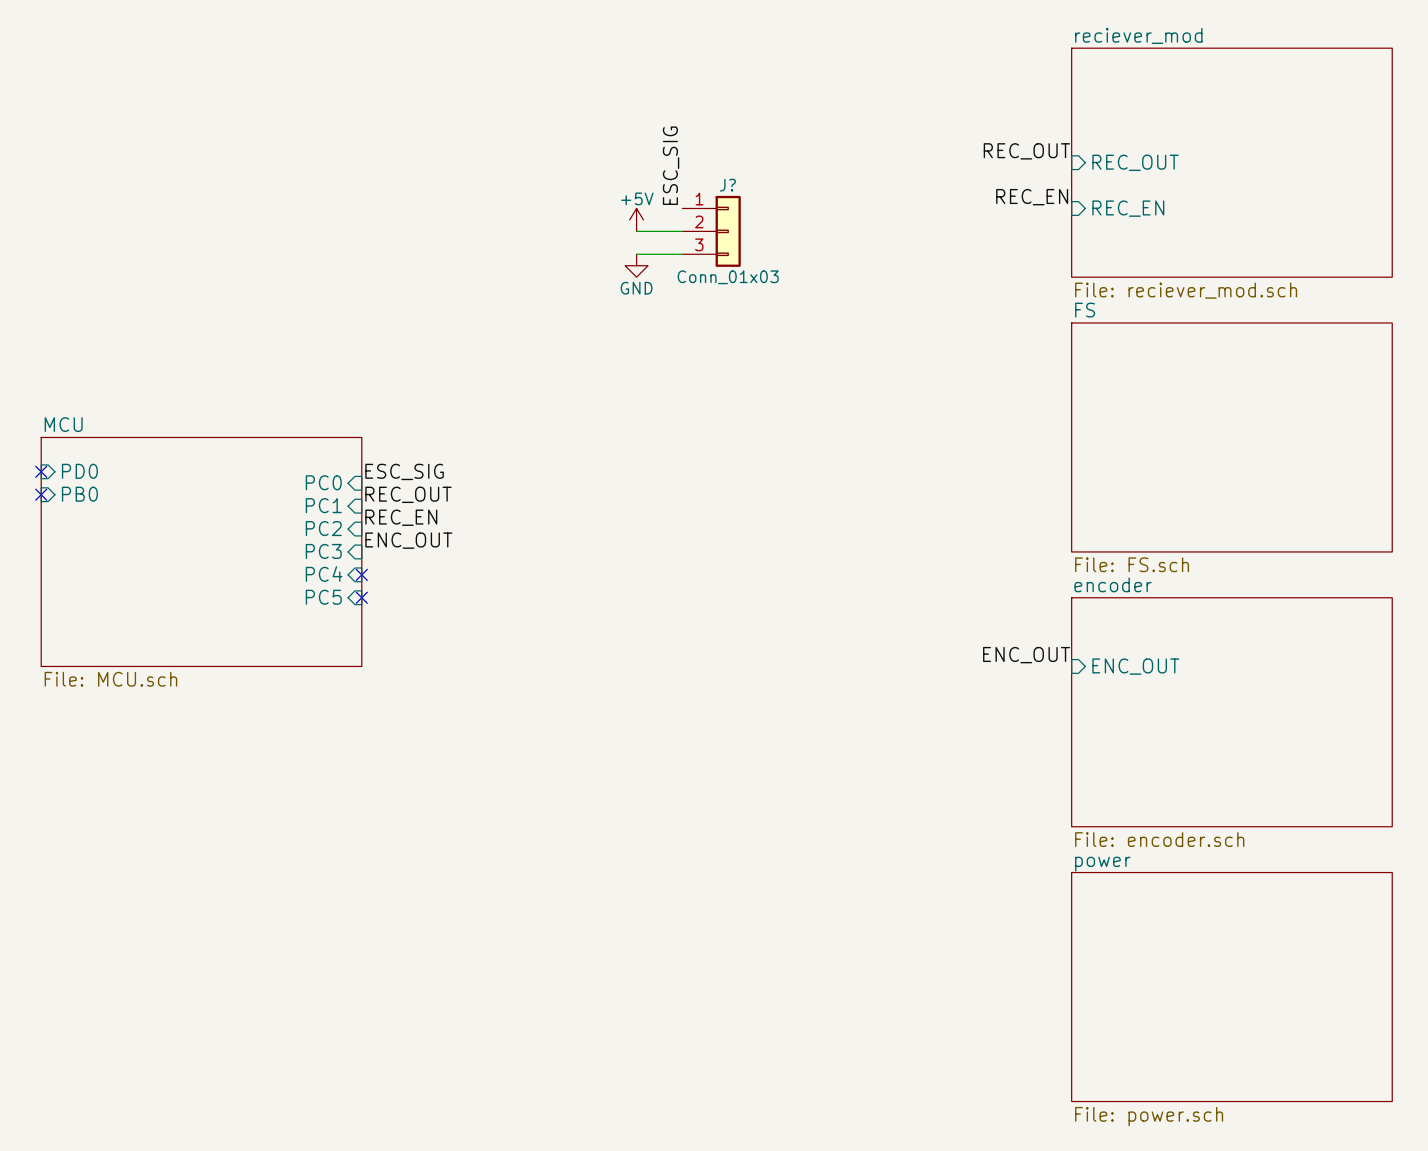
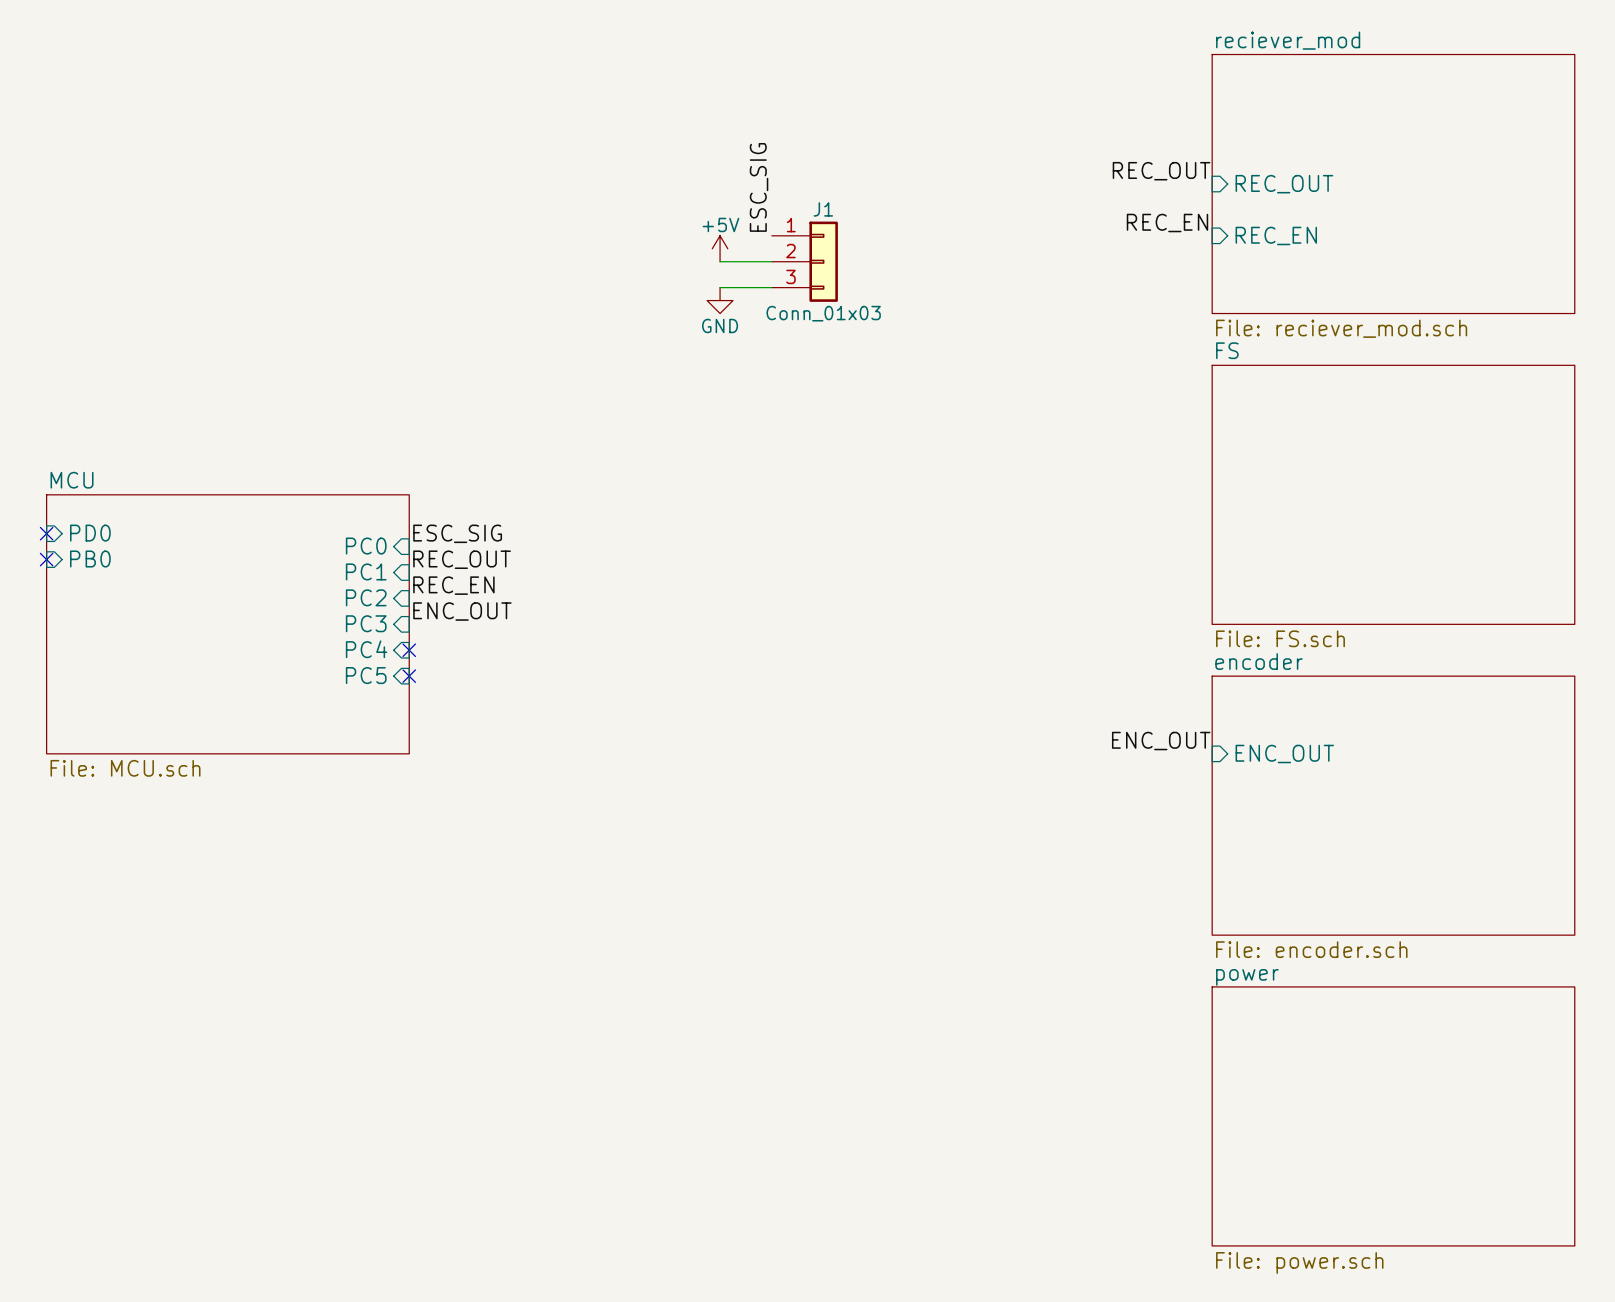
J? name: J? (727, 185) -> J1 (823, 209)

